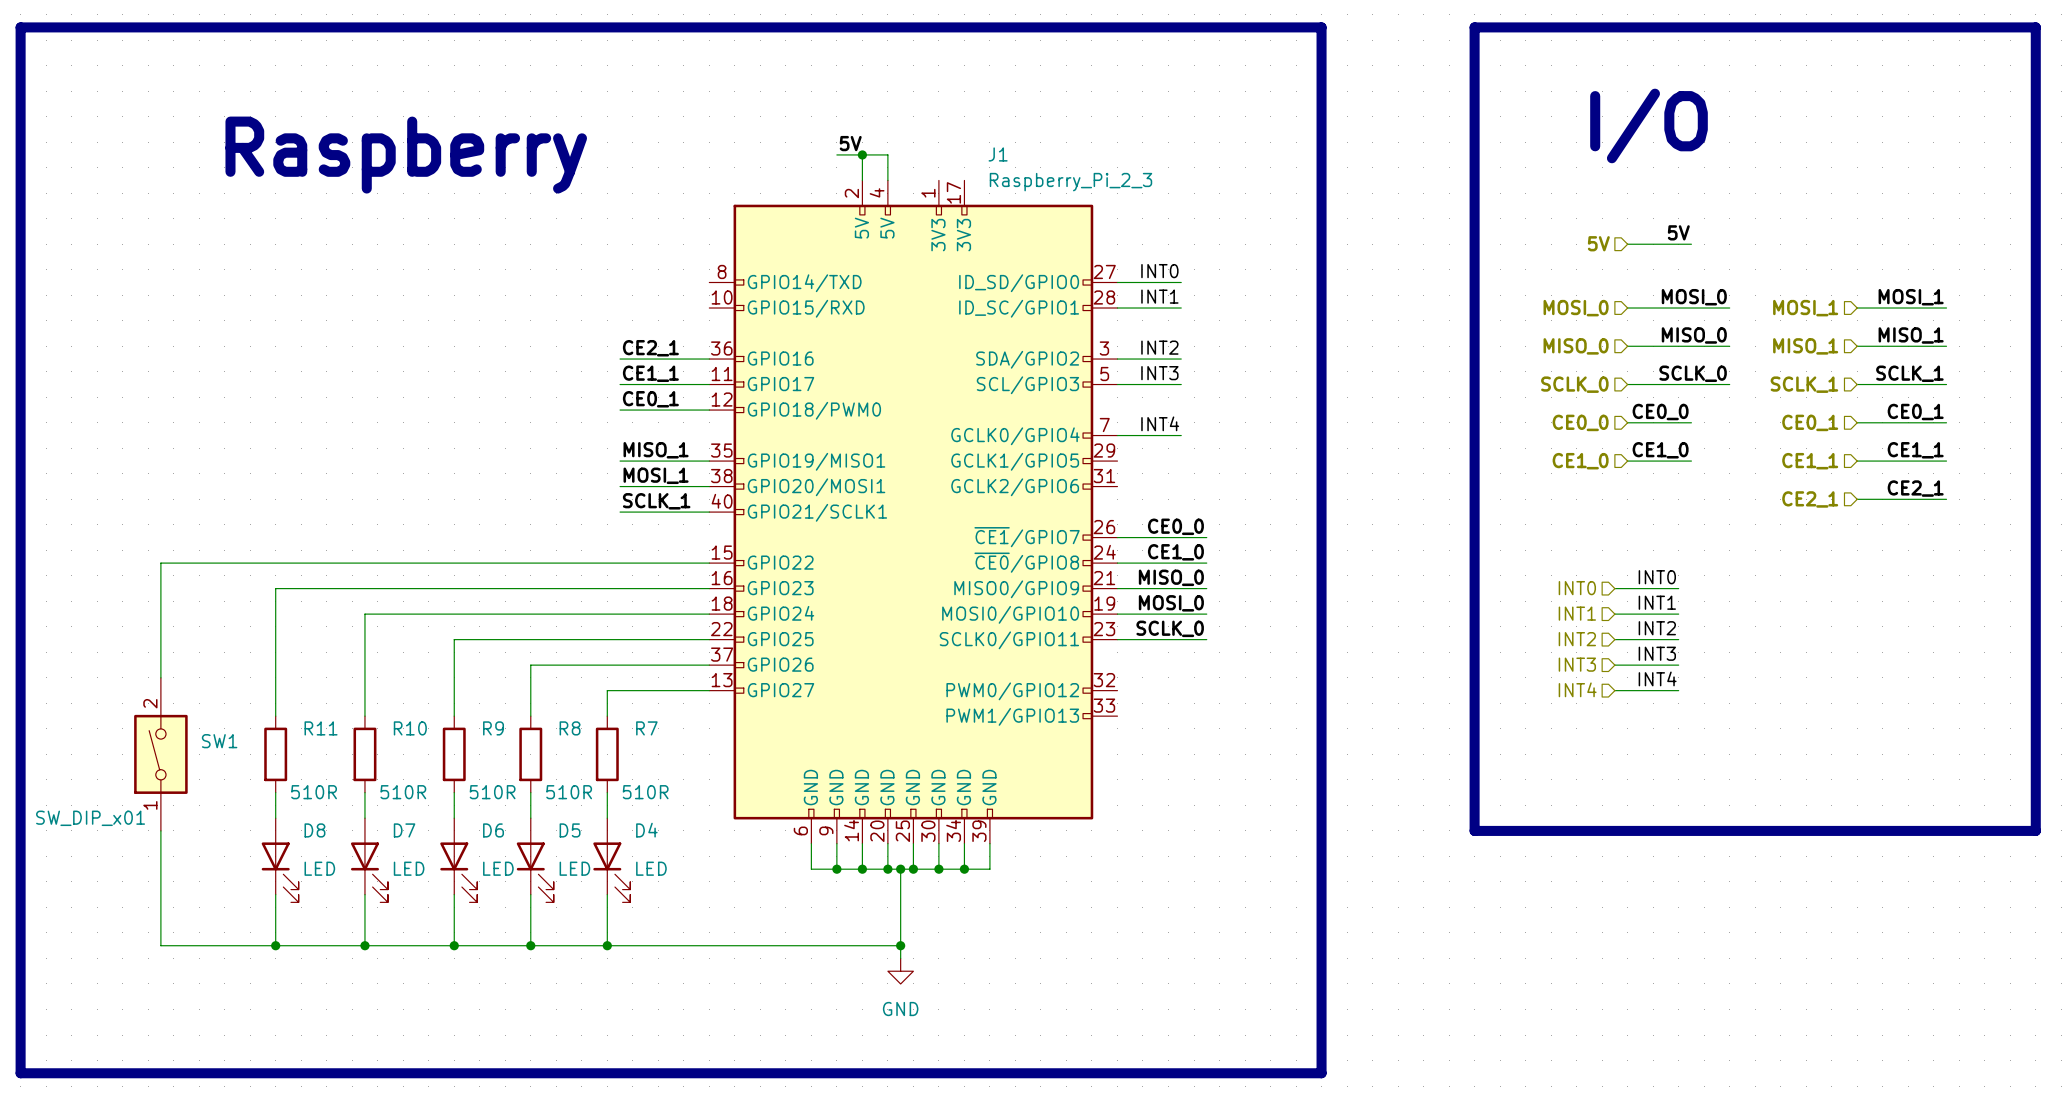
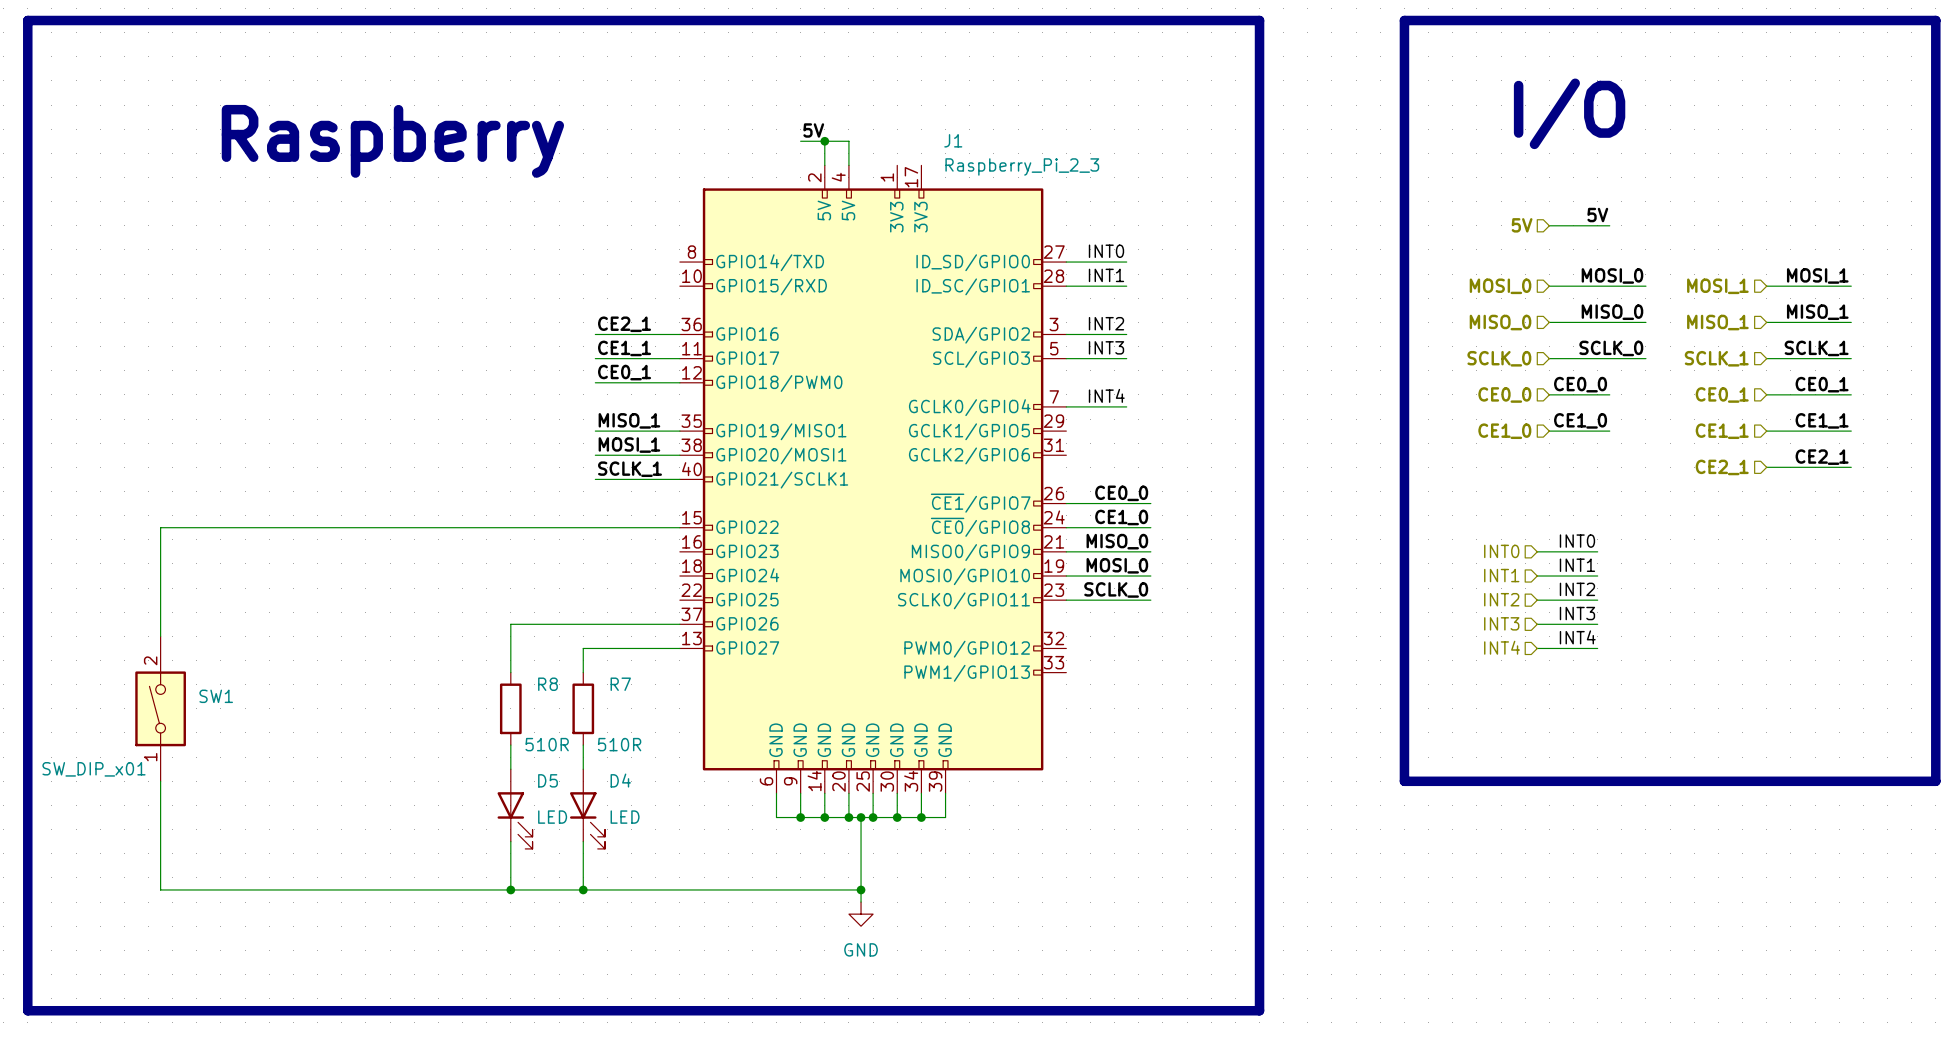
wire: (709, 588) (275, 588) (275, 716) -> none
wire: (709, 614) (364, 614) (364, 716) -> none
wire: (709, 639) (454, 639) (454, 716) -> none
R11: 510R (275, 754) -> none
R10: 510R (364, 754) -> none
R9: 510R (454, 754) -> none
wire: (275, 792) (275, 818) -> none
wire: (364, 792) (364, 818) -> none
wire: (454, 792) (454, 818) -> none
D8: LED (280, 860) -> none
D7: LED (369, 860) -> none
D6: LED (458, 860) -> none
wire: (275, 894) (275, 945) -> none
wire: (364, 894) (364, 945) -> none
wire: (454, 894) (454, 945) -> none
junction: (275, 945) -> none
junction: (364, 945) -> none
junction: (454, 945) -> none

